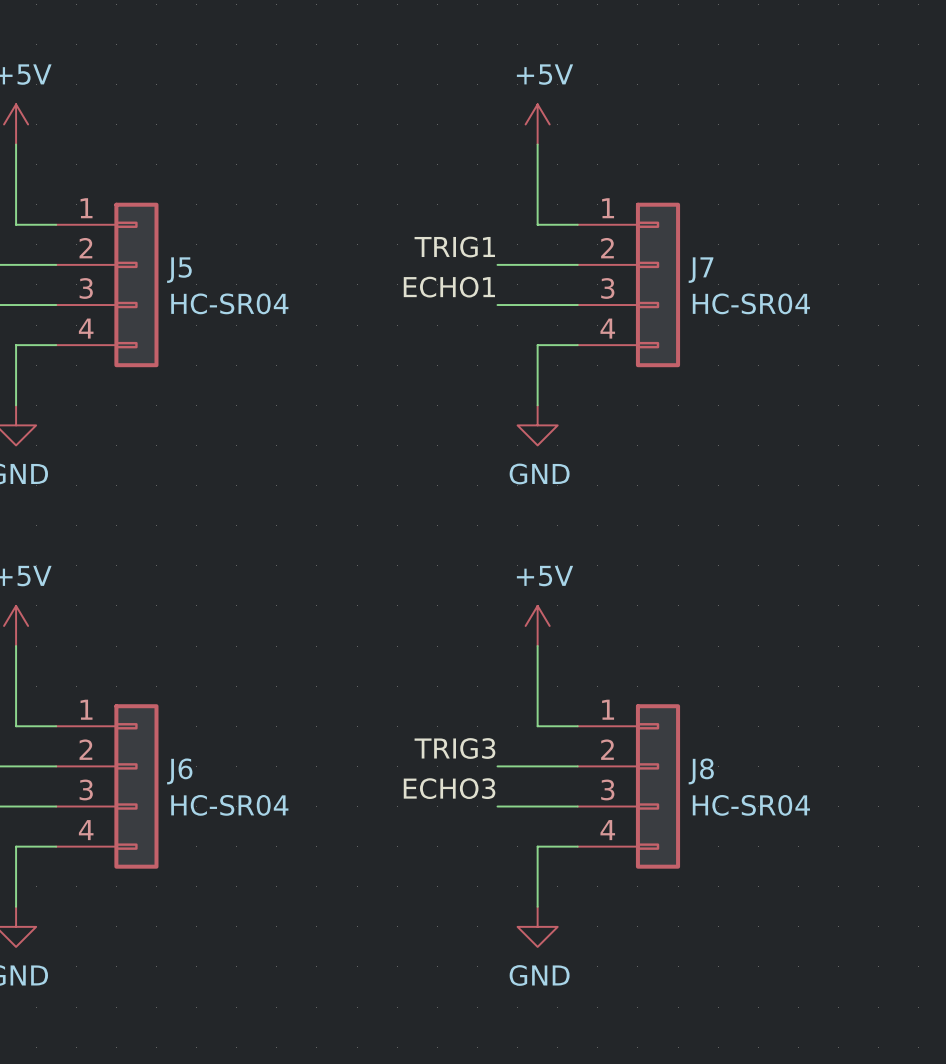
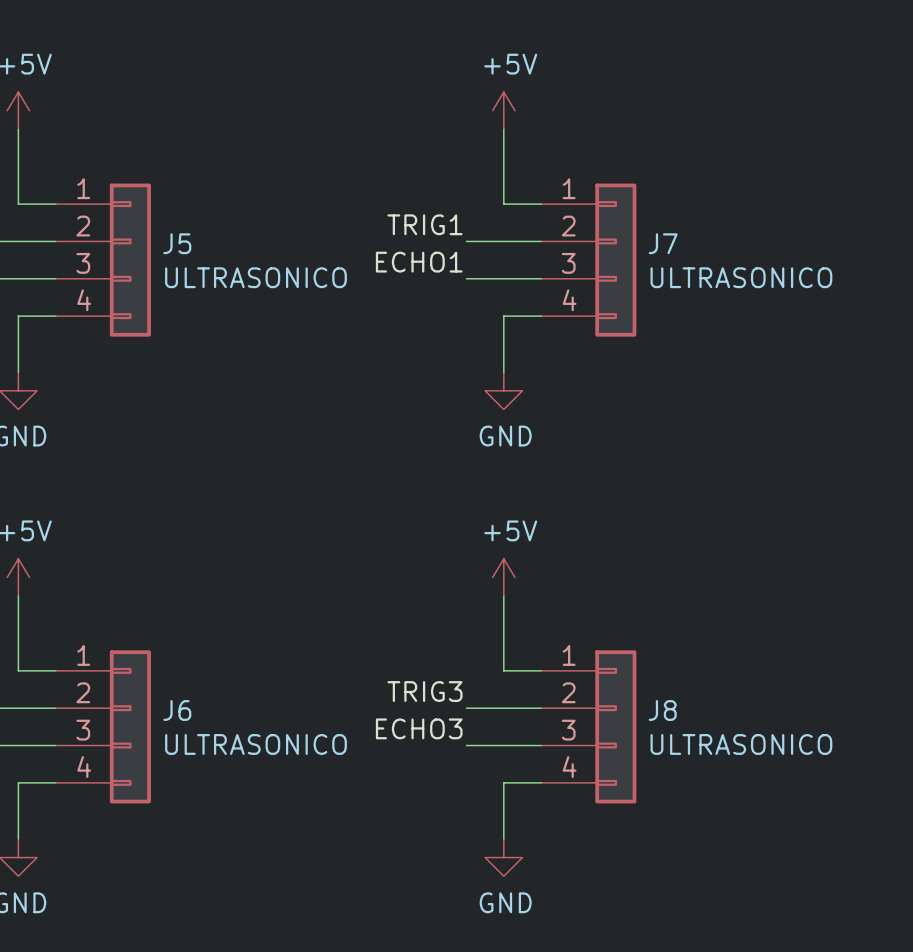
J5 value: HC-SR04 (229, 303) -> ULTRASONICO (255, 277)
J7 value: HC-SR04 (751, 303) -> ULTRASONICO (741, 277)
J6 value: HC-SR04 (229, 805) -> ULTRASONICO (255, 744)
J8 value: HC-SR04 (751, 805) -> ULTRASONICO (741, 744)

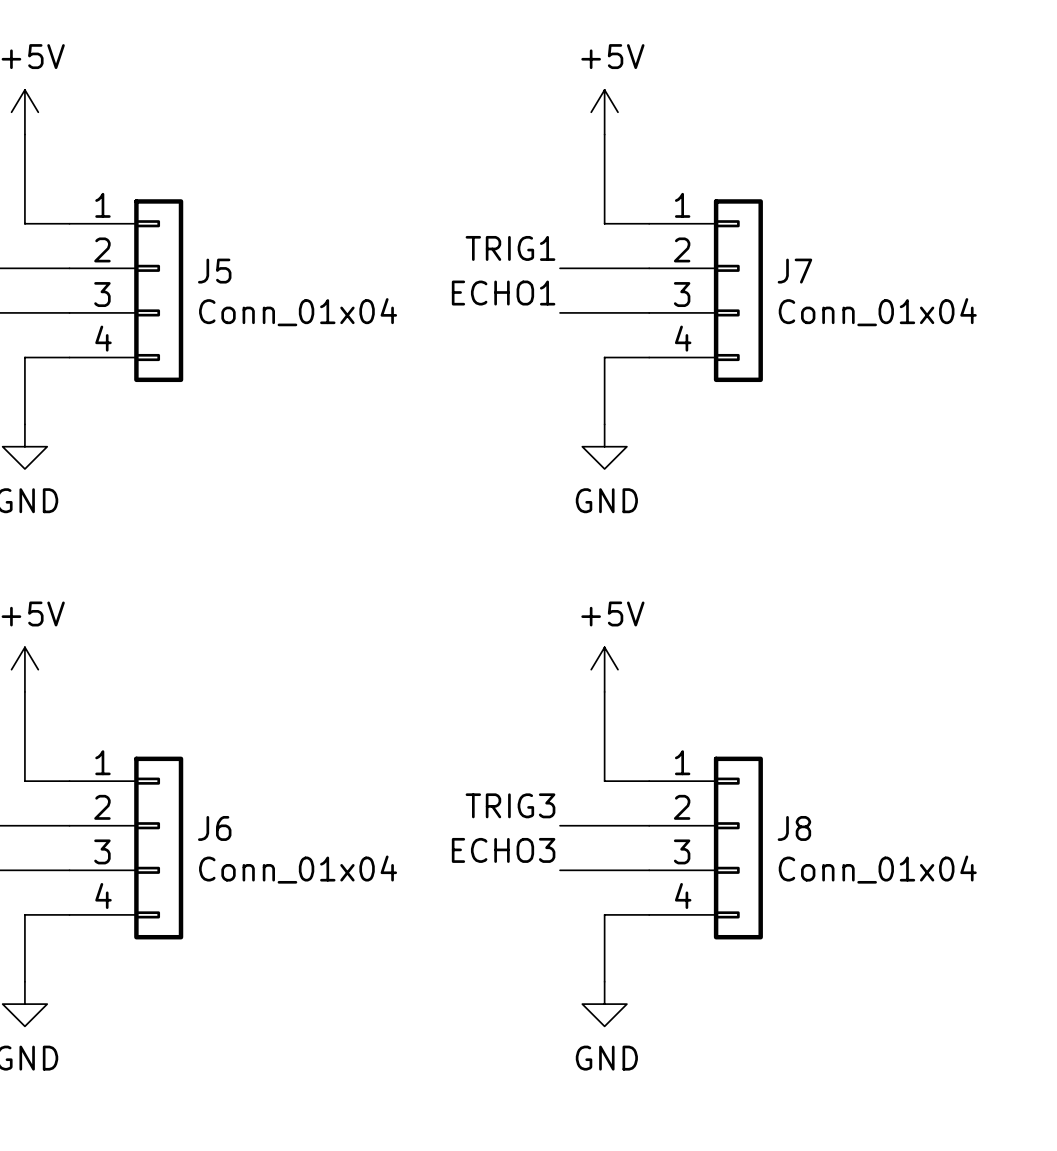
J5 value: ULTRASONICO (255, 277) -> Conn_01x04 (298, 312)
J7 value: ULTRASONICO (741, 277) -> Conn_01x04 (877, 312)
J6 value: ULTRASONICO (255, 744) -> Conn_01x04 (298, 869)
J8 value: ULTRASONICO (741, 744) -> Conn_01x04 (877, 869)

